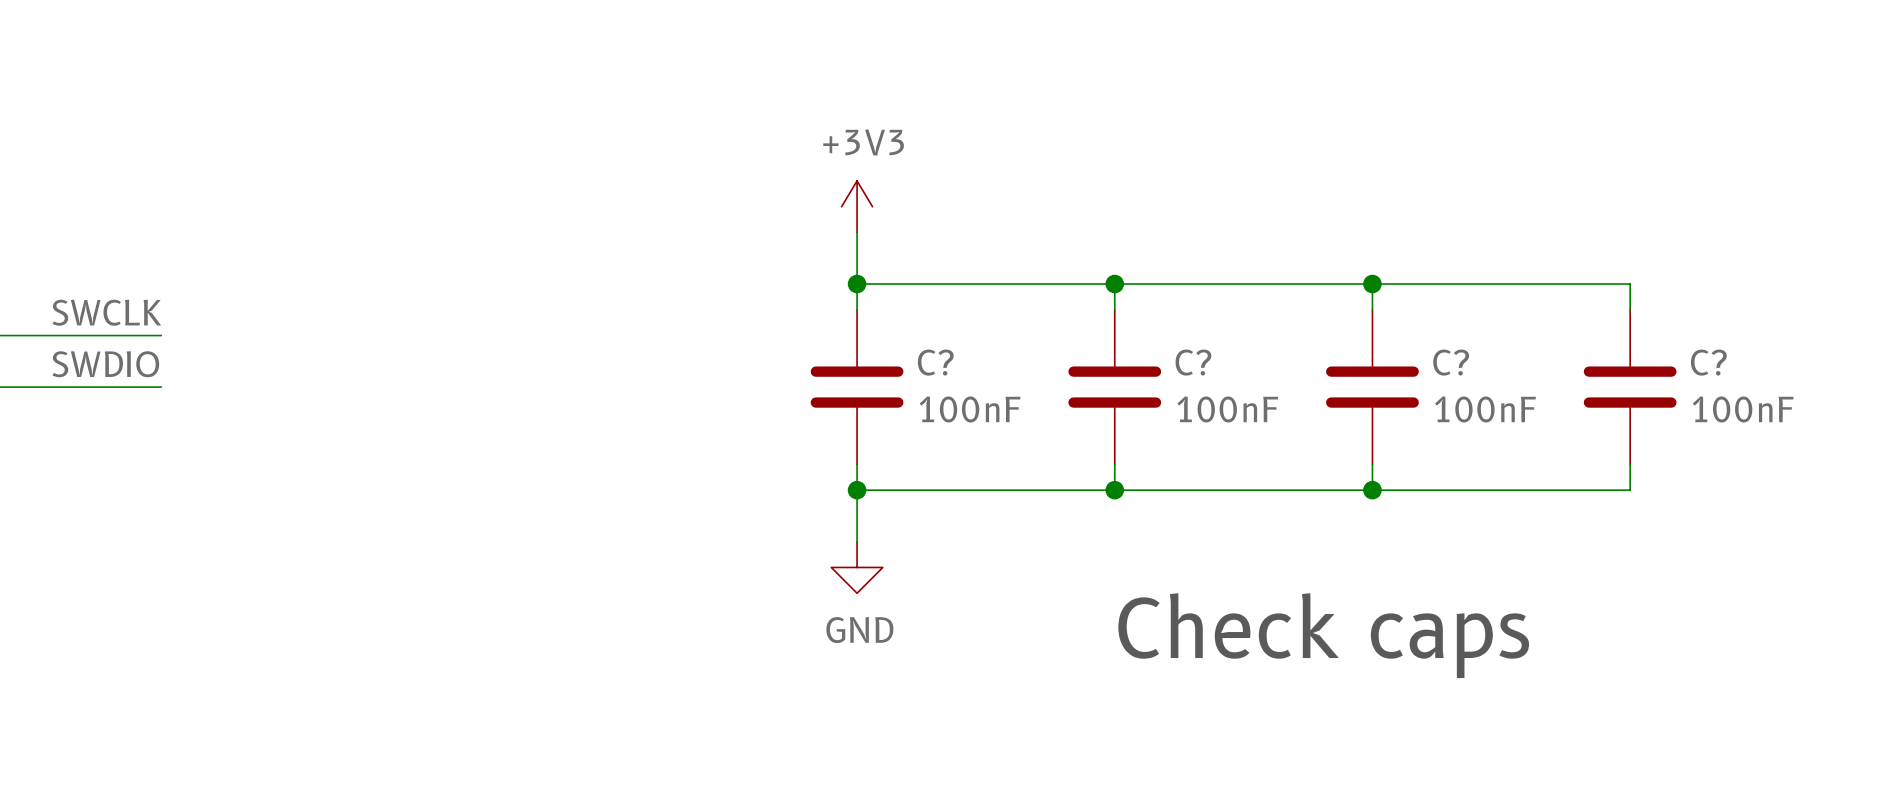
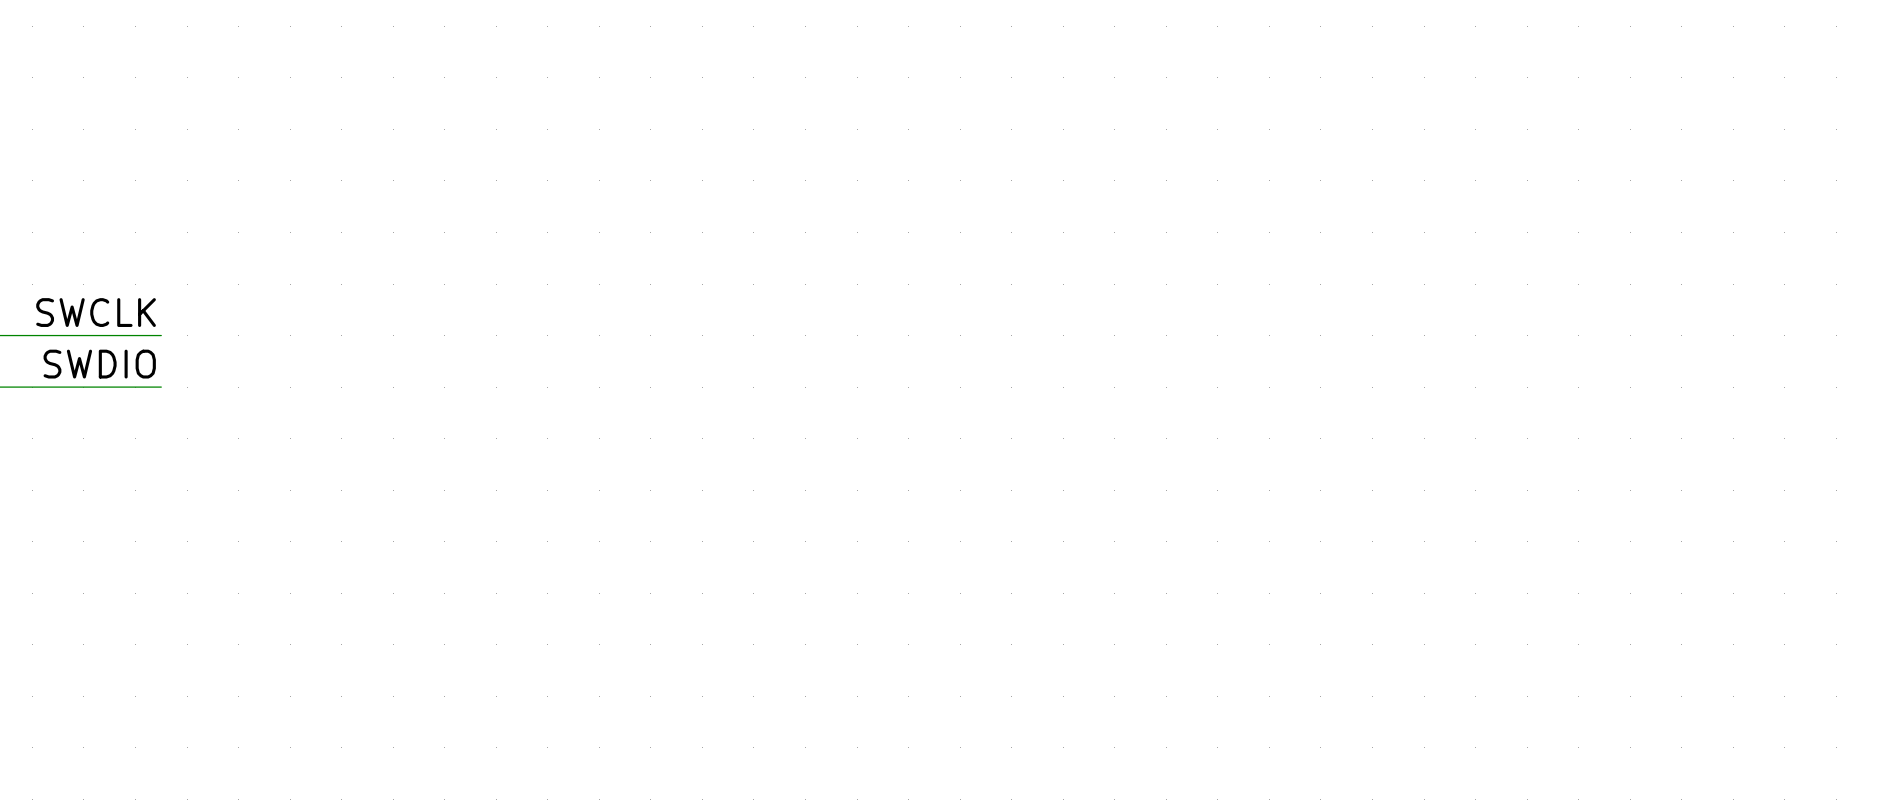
power symbol: +3V3 (857, 206) -> none
wire: (857, 232) (857, 309) -> none
wire: (857, 284) (1630, 284) (1630, 309) -> none
junction: (857, 284) -> none
wire: (1114, 284) (1114, 309) -> none
junction: (1114, 284) -> none
wire: (1372, 284) (1372, 309) -> none
junction: (1372, 284) -> none
C?: 100nF (857, 387) -> none
C?: 100nF (1114, 387) -> none
C?: 100nF (1372, 387) -> none
C?: 100nF (1630, 387) -> none
wire: (857, 464) (857, 541) -> none
wire: (1114, 464) (1114, 490) -> none
wire: (1372, 464) (1372, 490) -> none
wire: (1630, 464) (1630, 490) (857, 490) -> none
junction: (857, 490) -> none
junction: (1114, 490) -> none
junction: (1372, 490) -> none
power symbol: GND (857, 567) -> none
text: Check caps (1323, 635) -> none

